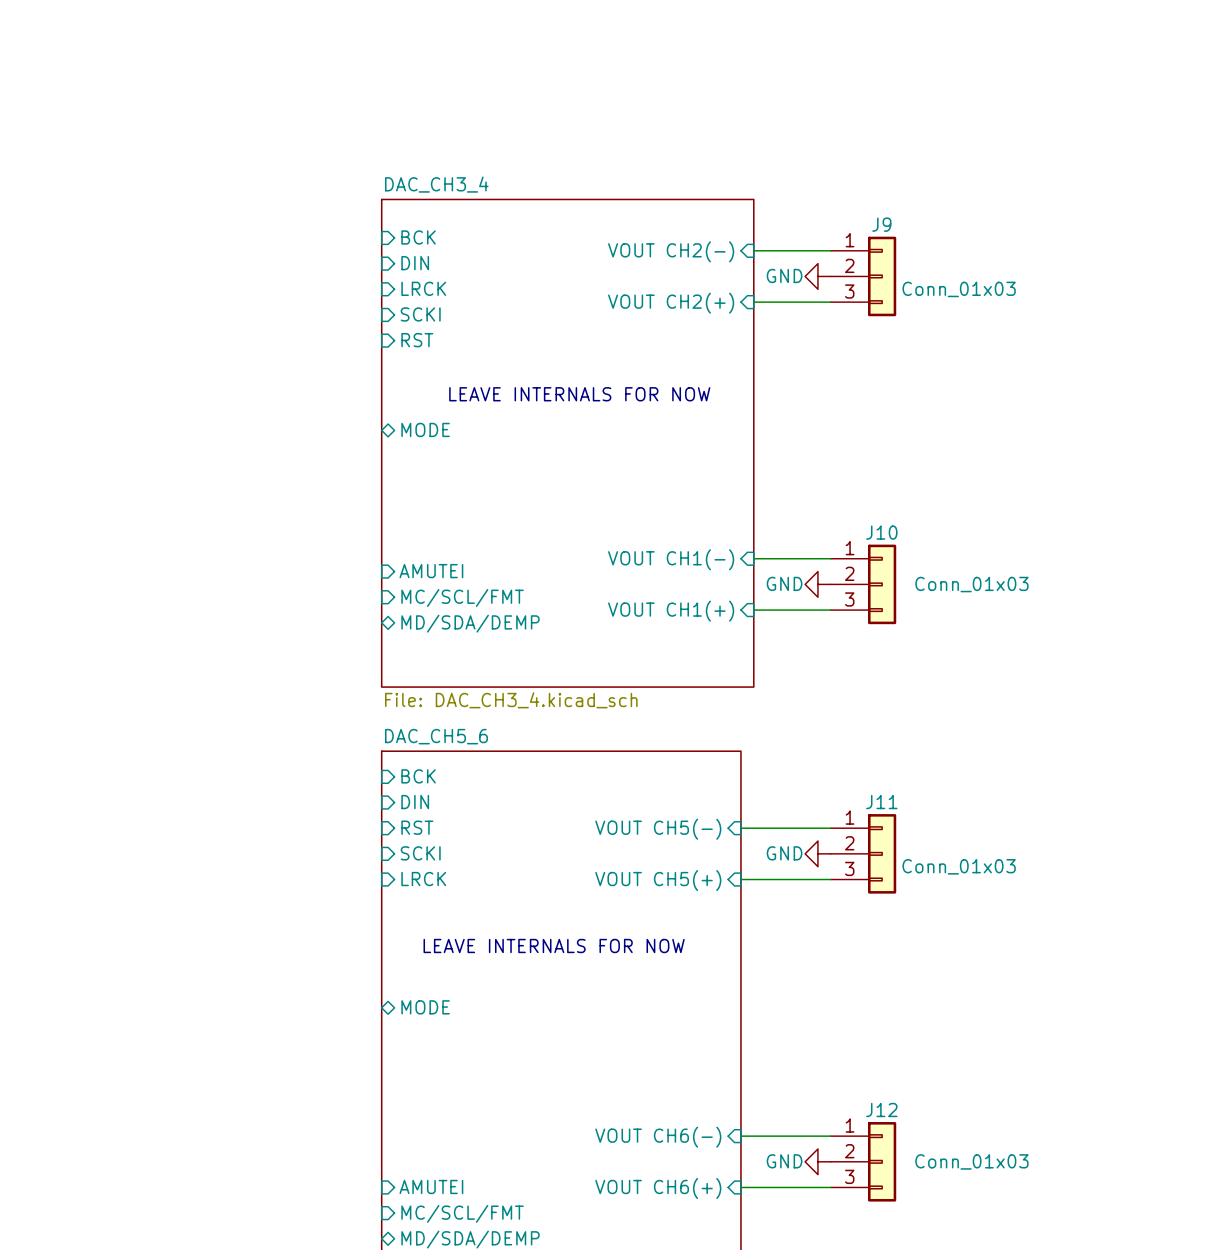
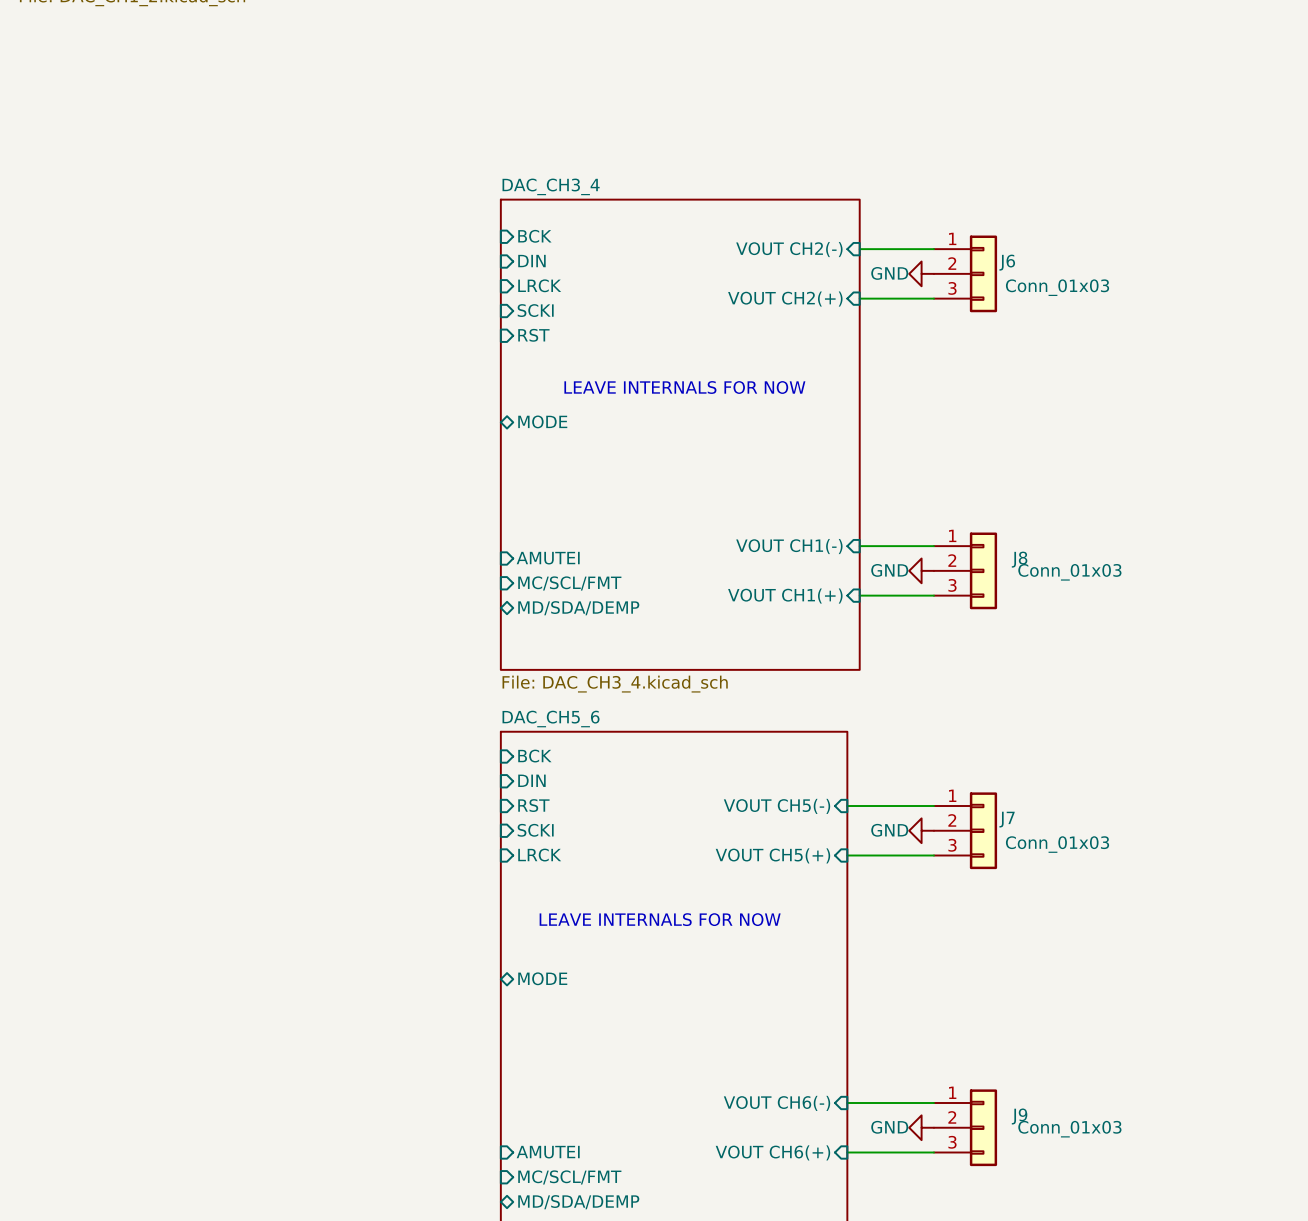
J9 name: J9 (881, 224) -> J6 (1007, 262)
J10 name: J10 (881, 532) -> J8 (1019, 559)
J11 name: J11 (881, 802) -> J7 (1007, 819)
J12 name: J12 (881, 1110) -> J9 (1019, 1116)

